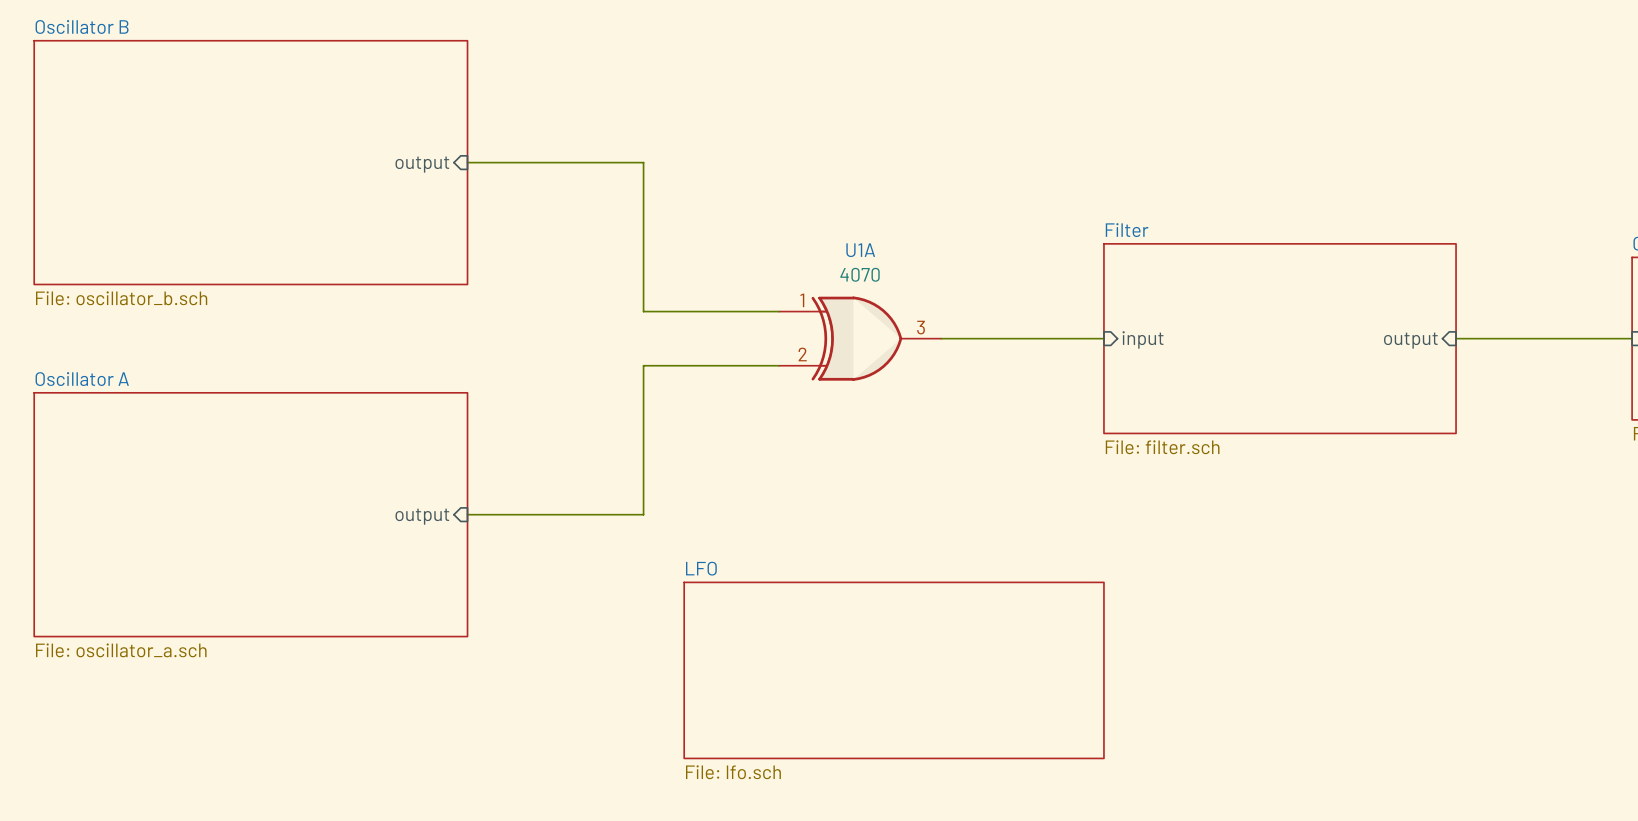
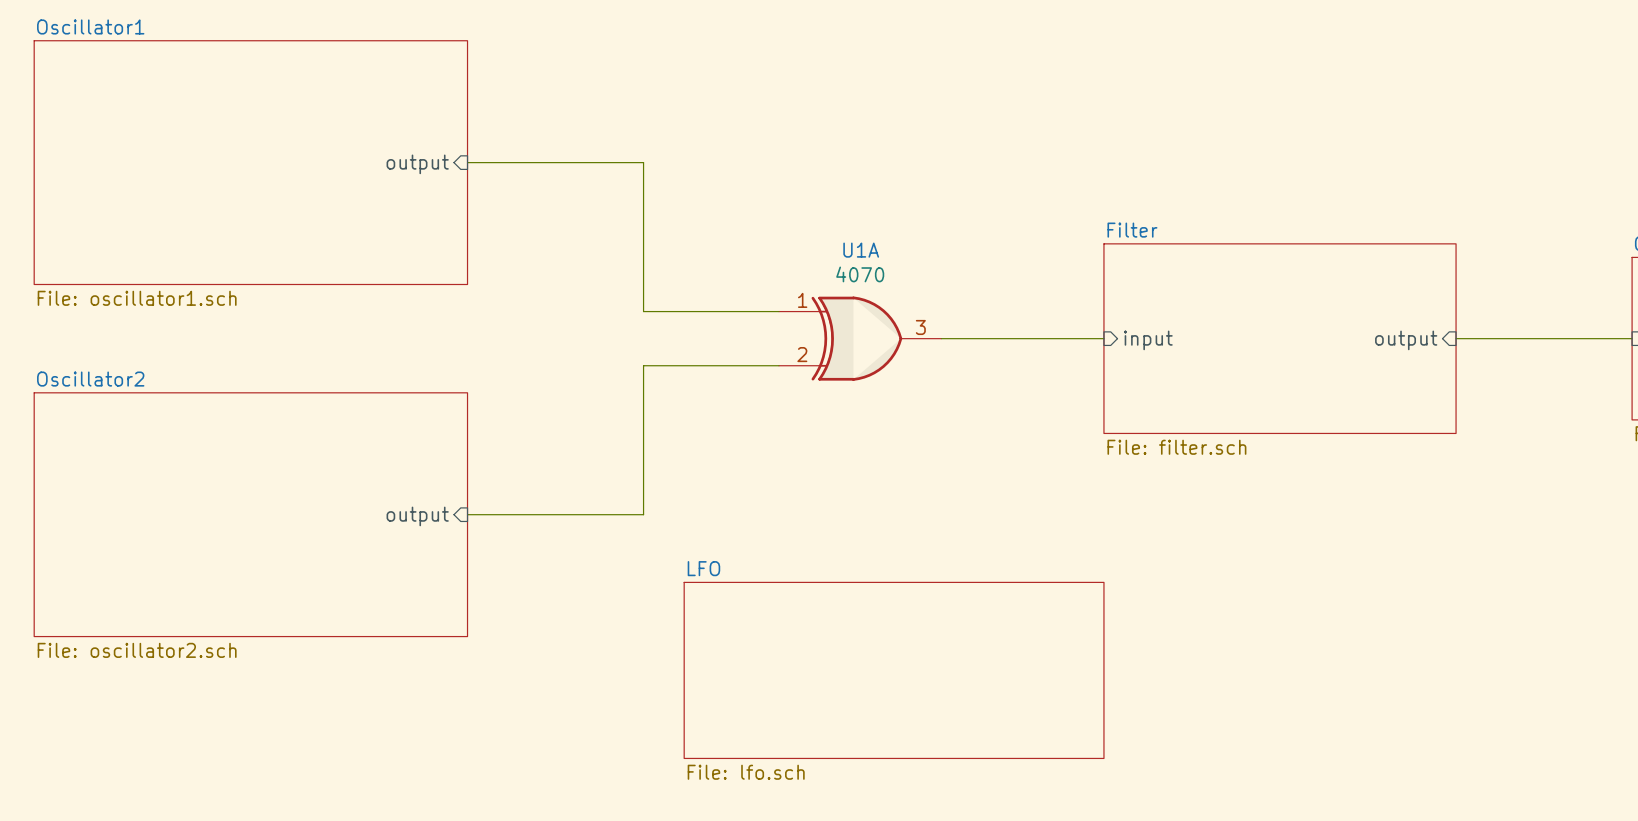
sheet Oscillator B name: Oscillator B (82, 26) -> Oscillator1 (90, 26)
sheet Oscillator B value: File: oscillator_b.sch (121, 298) -> File: oscillator1.sch (137, 298)
sheet Oscillator A name: Oscillator A (82, 379) -> Oscillator2 (90, 379)
sheet Oscillator A value: File: oscillator_a.sch (121, 650) -> File: oscillator2.sch (137, 650)

